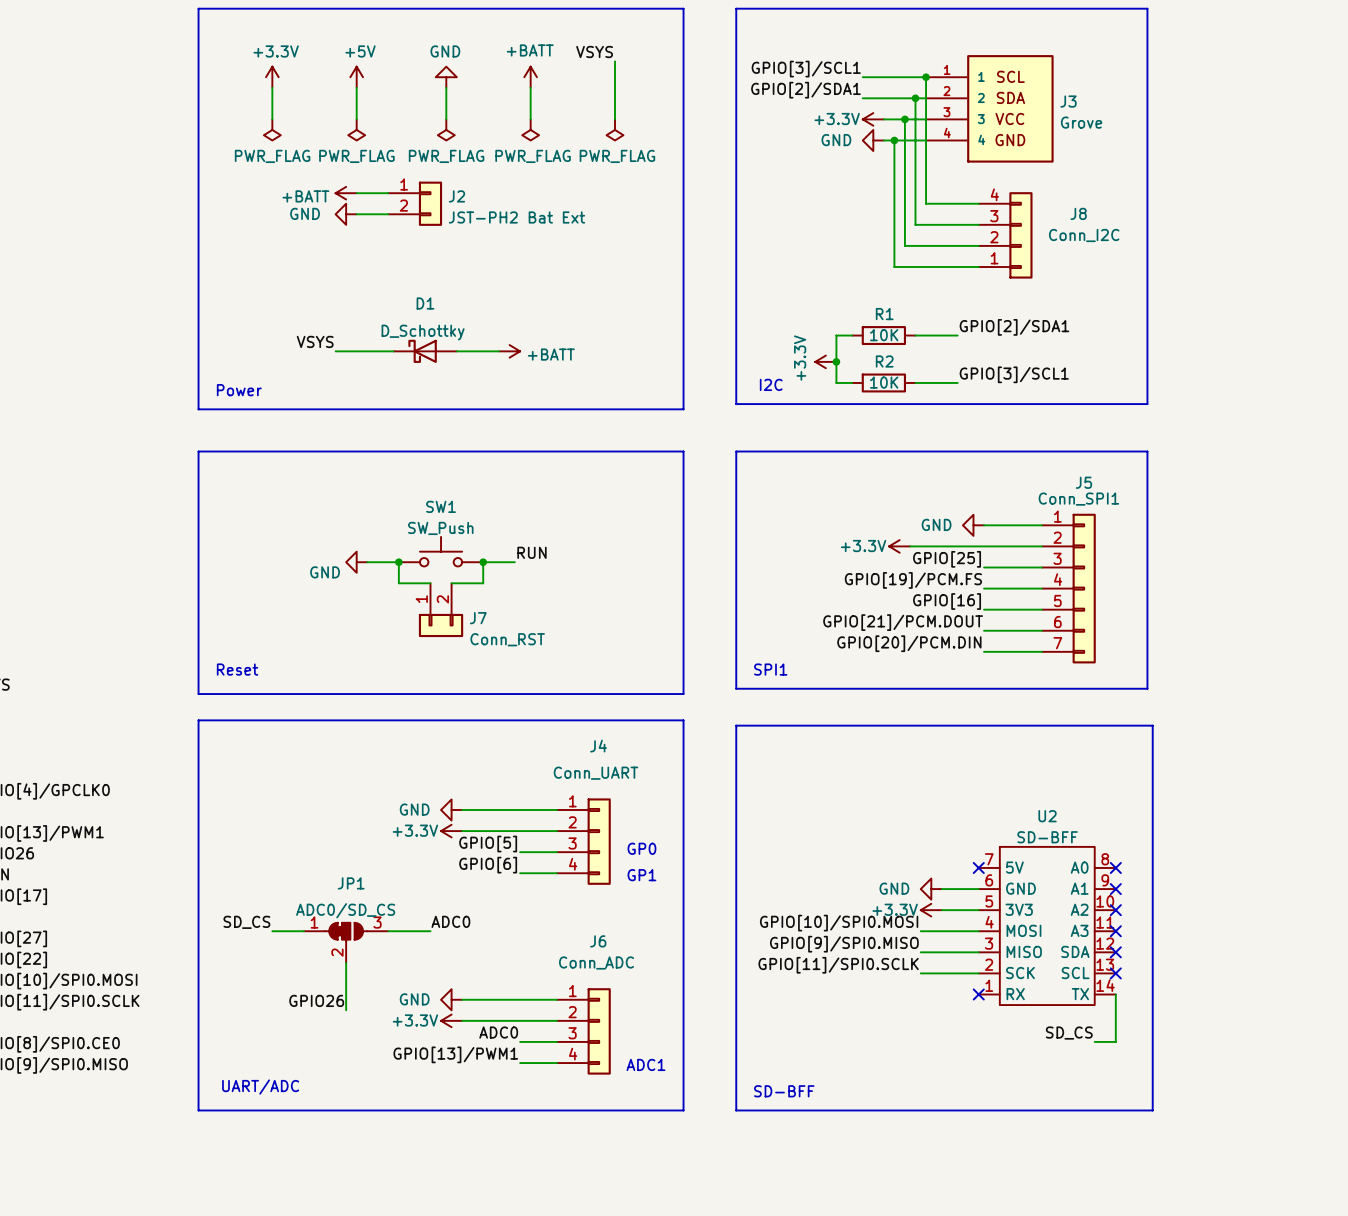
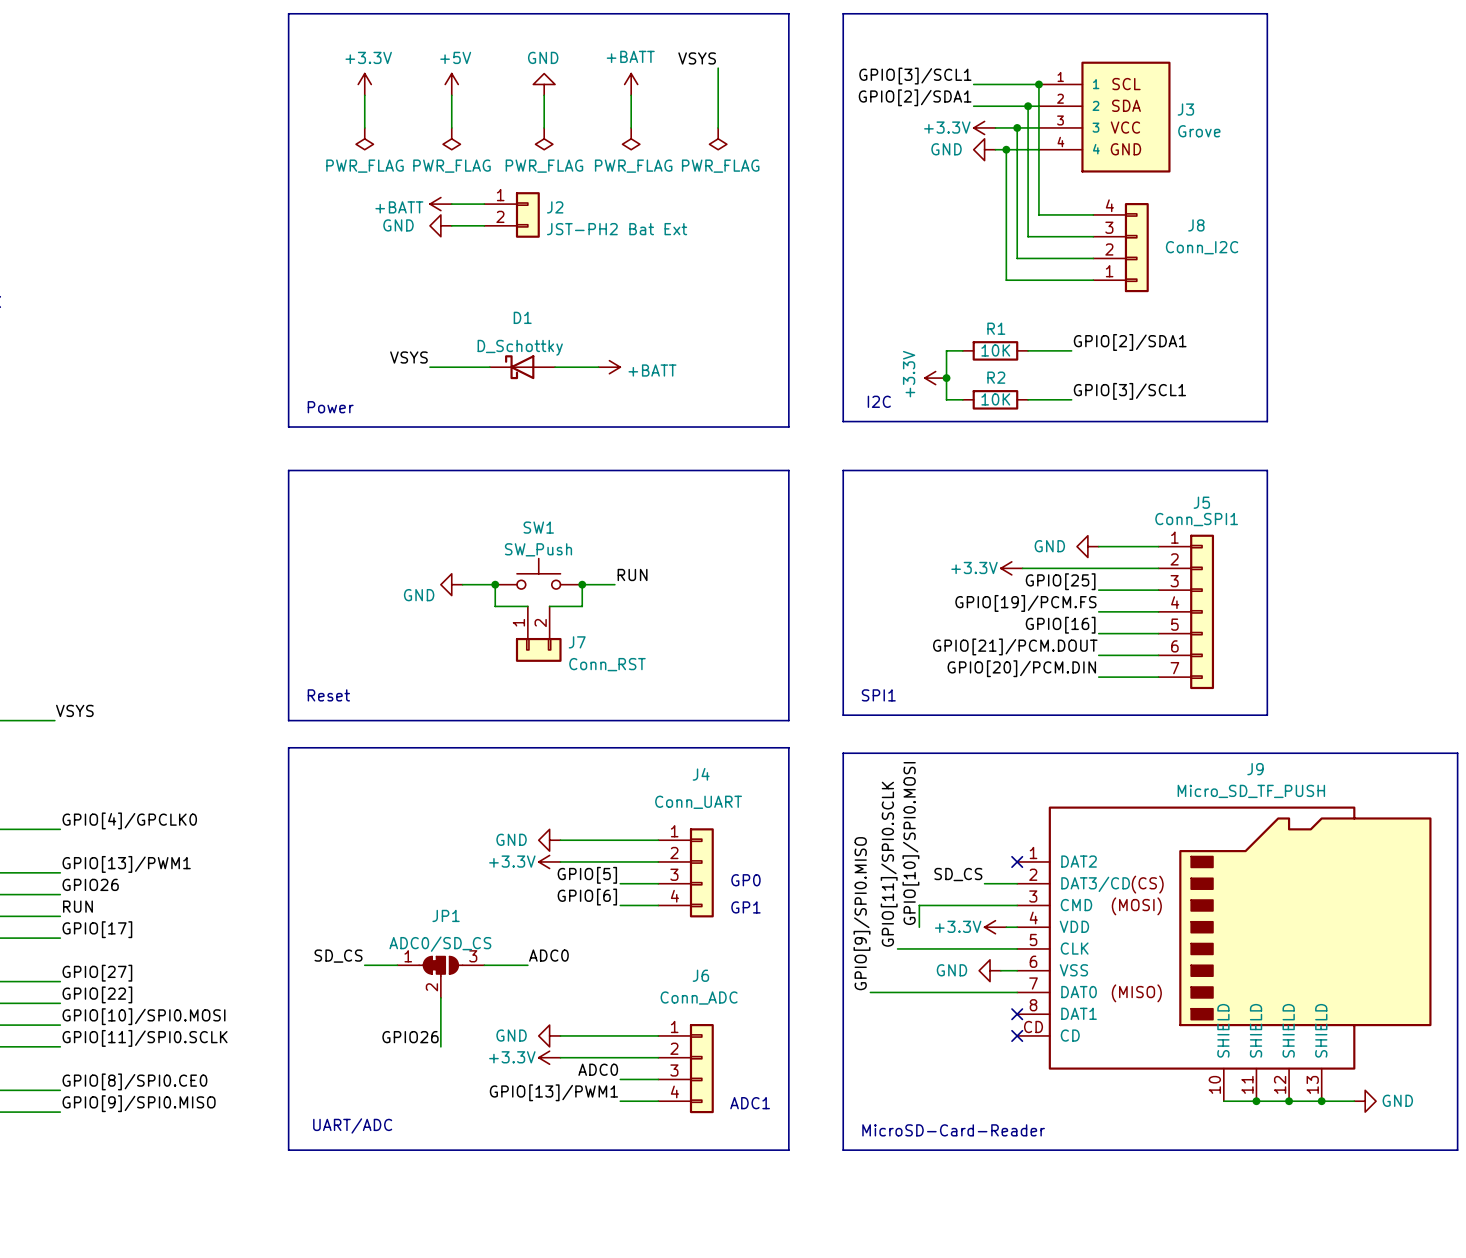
line: (1152, 725) (1152, 1110) -> (1272, 753) (1457, 753) (1457, 1150) (1272, 1150)
no-connect mark: none -> (1017, 861)
label: none -> SD_CS (958, 874)
wire: none -> (984, 883) (1017, 883)
no-connect mark: (978, 867) -> none
no-connect mark: (1115, 867) -> none
wire: none -> (1017, 905) (919, 905) (919, 927)
power symbol position: GND (931, 889) -> GND (990, 970)
wire: (941, 889) (978, 889) -> none
no-connect mark: (1115, 889) -> none
wire: none -> (1006, 927) (1017, 927)
power symbol position: +3.3V (931, 910) -> +3.3V (995, 927)
wire: (941, 910) (978, 910) -> none
no-connect mark: (1115, 910) -> none
wire: none -> (897, 948) (1017, 948)
J9: none -> Micro_SD_TF_PUSH (1224, 953)
label rotation: 0° (839, 923) -> 90° counterclockwise (910, 843)
U2: SD-BFF (1047, 925) -> none
wire: (920, 931) (978, 931) -> none
no-connect mark: (1115, 931) -> none
wire: none -> (1000, 970) (1017, 970)
label rotation: 0° (844, 944) -> 90° counterclockwise (862, 913)
wire: (920, 952) (978, 952) -> none
no-connect mark: (1115, 952) -> none
wire: none -> (870, 992) (1017, 992)
label rotation: 0° (838, 965) -> 90° counterclockwise (889, 864)
wire: (920, 973) (978, 973) -> none
no-connect mark: (1115, 973) -> none
no-connect mark: none -> (1017, 1014)
no-connect mark: (978, 994) -> none
wire: (1115, 994) (1115, 1041) (1094, 1041) -> none
no-connect mark: none -> (1017, 1035)
label: SD_CS (1069, 1033) -> none
wire: none -> (1223, 1101) (1354, 1101)
junction: none -> (1256, 1101)
junction: none -> (1289, 1101)
junction: none -> (1321, 1101)
power symbol: none -> GND (1365, 1101)
text: SD-BFF (784, 1091) -> MicroSD-Card-Reader (953, 1130)

